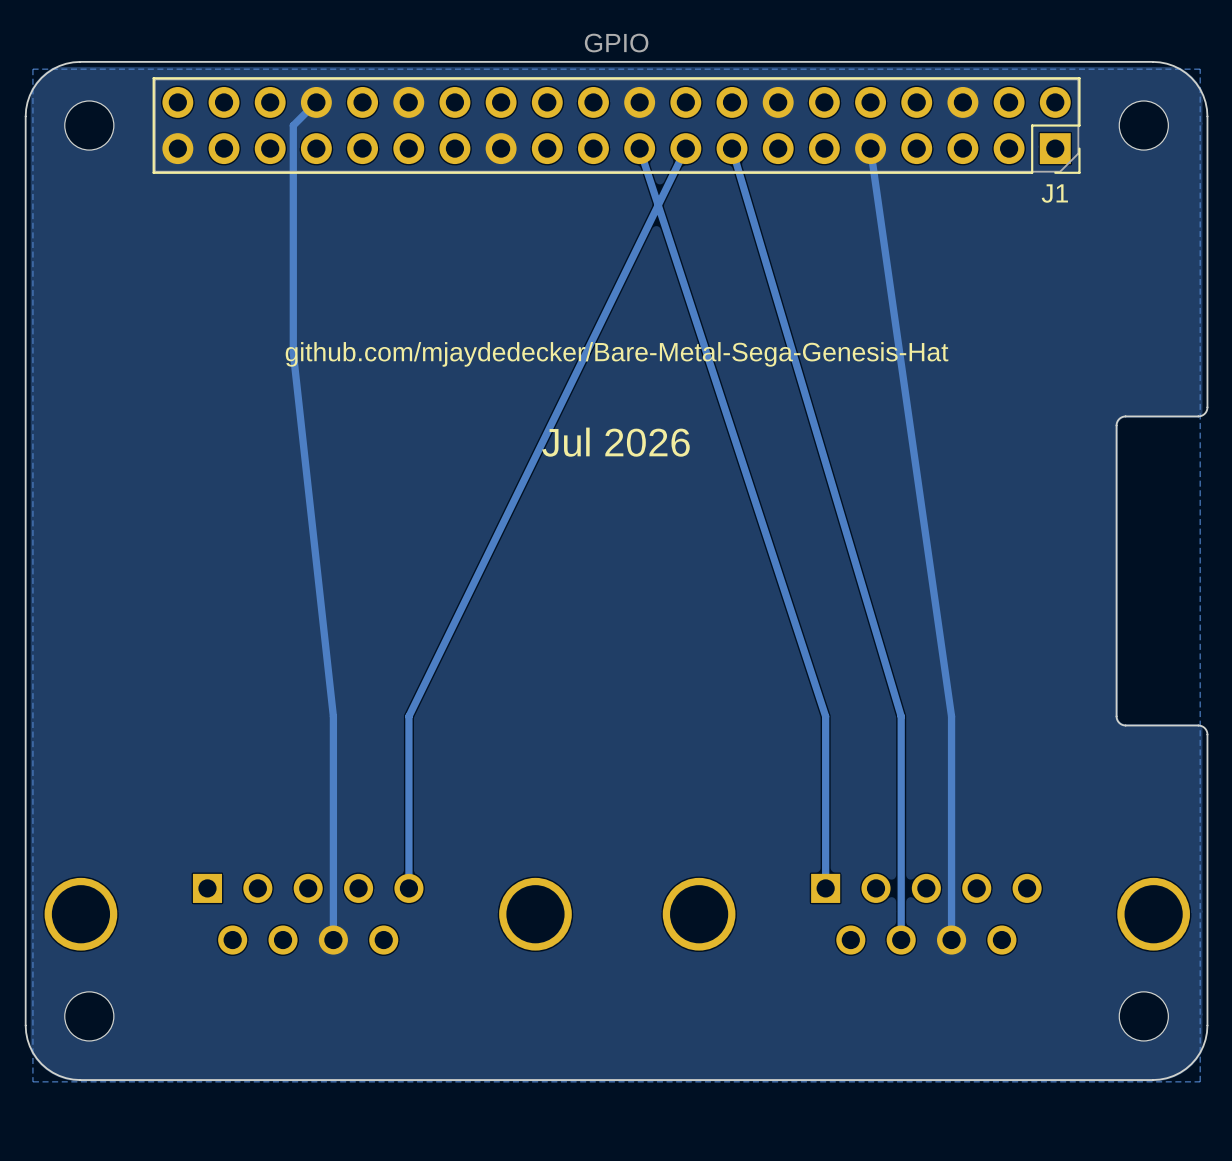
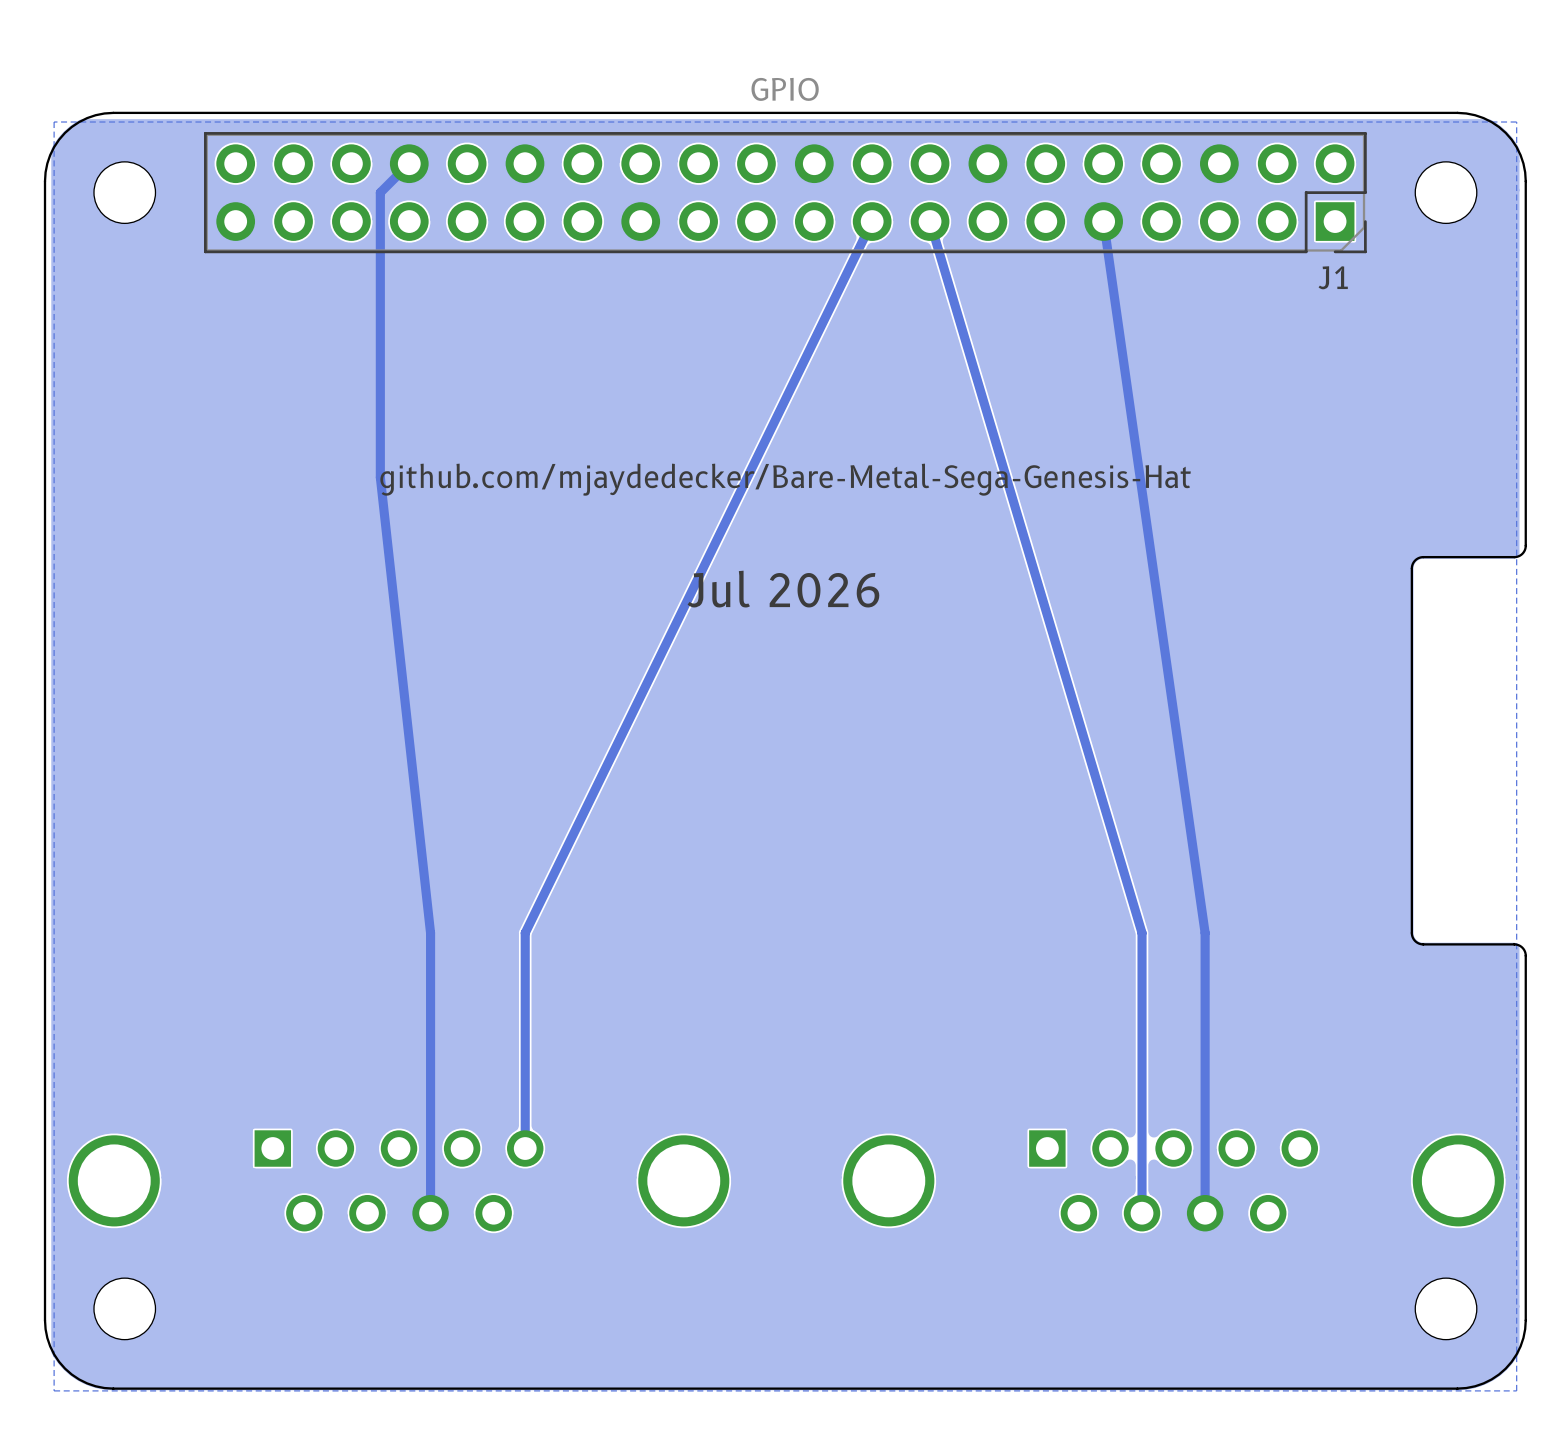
track: (639, 148) (825, 716) (825, 888) -> none

